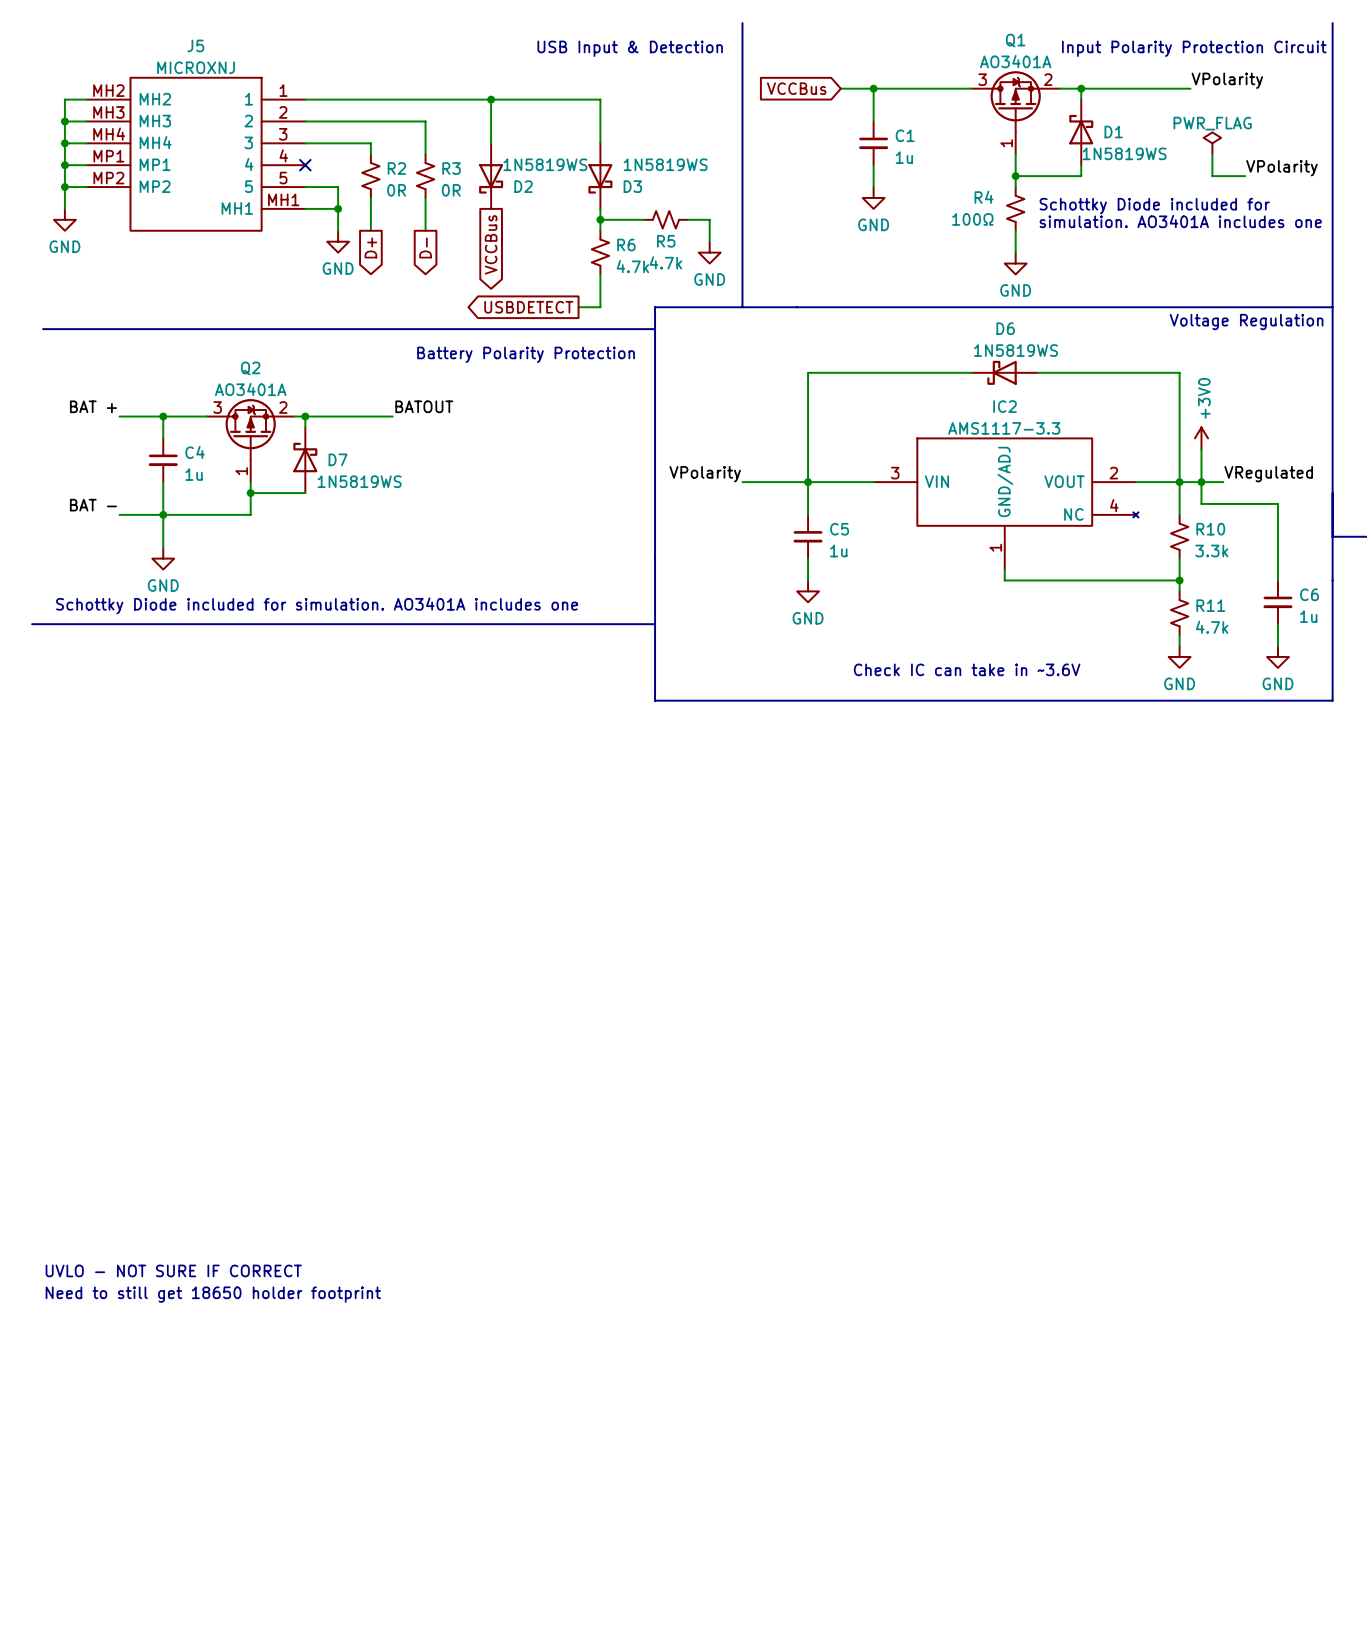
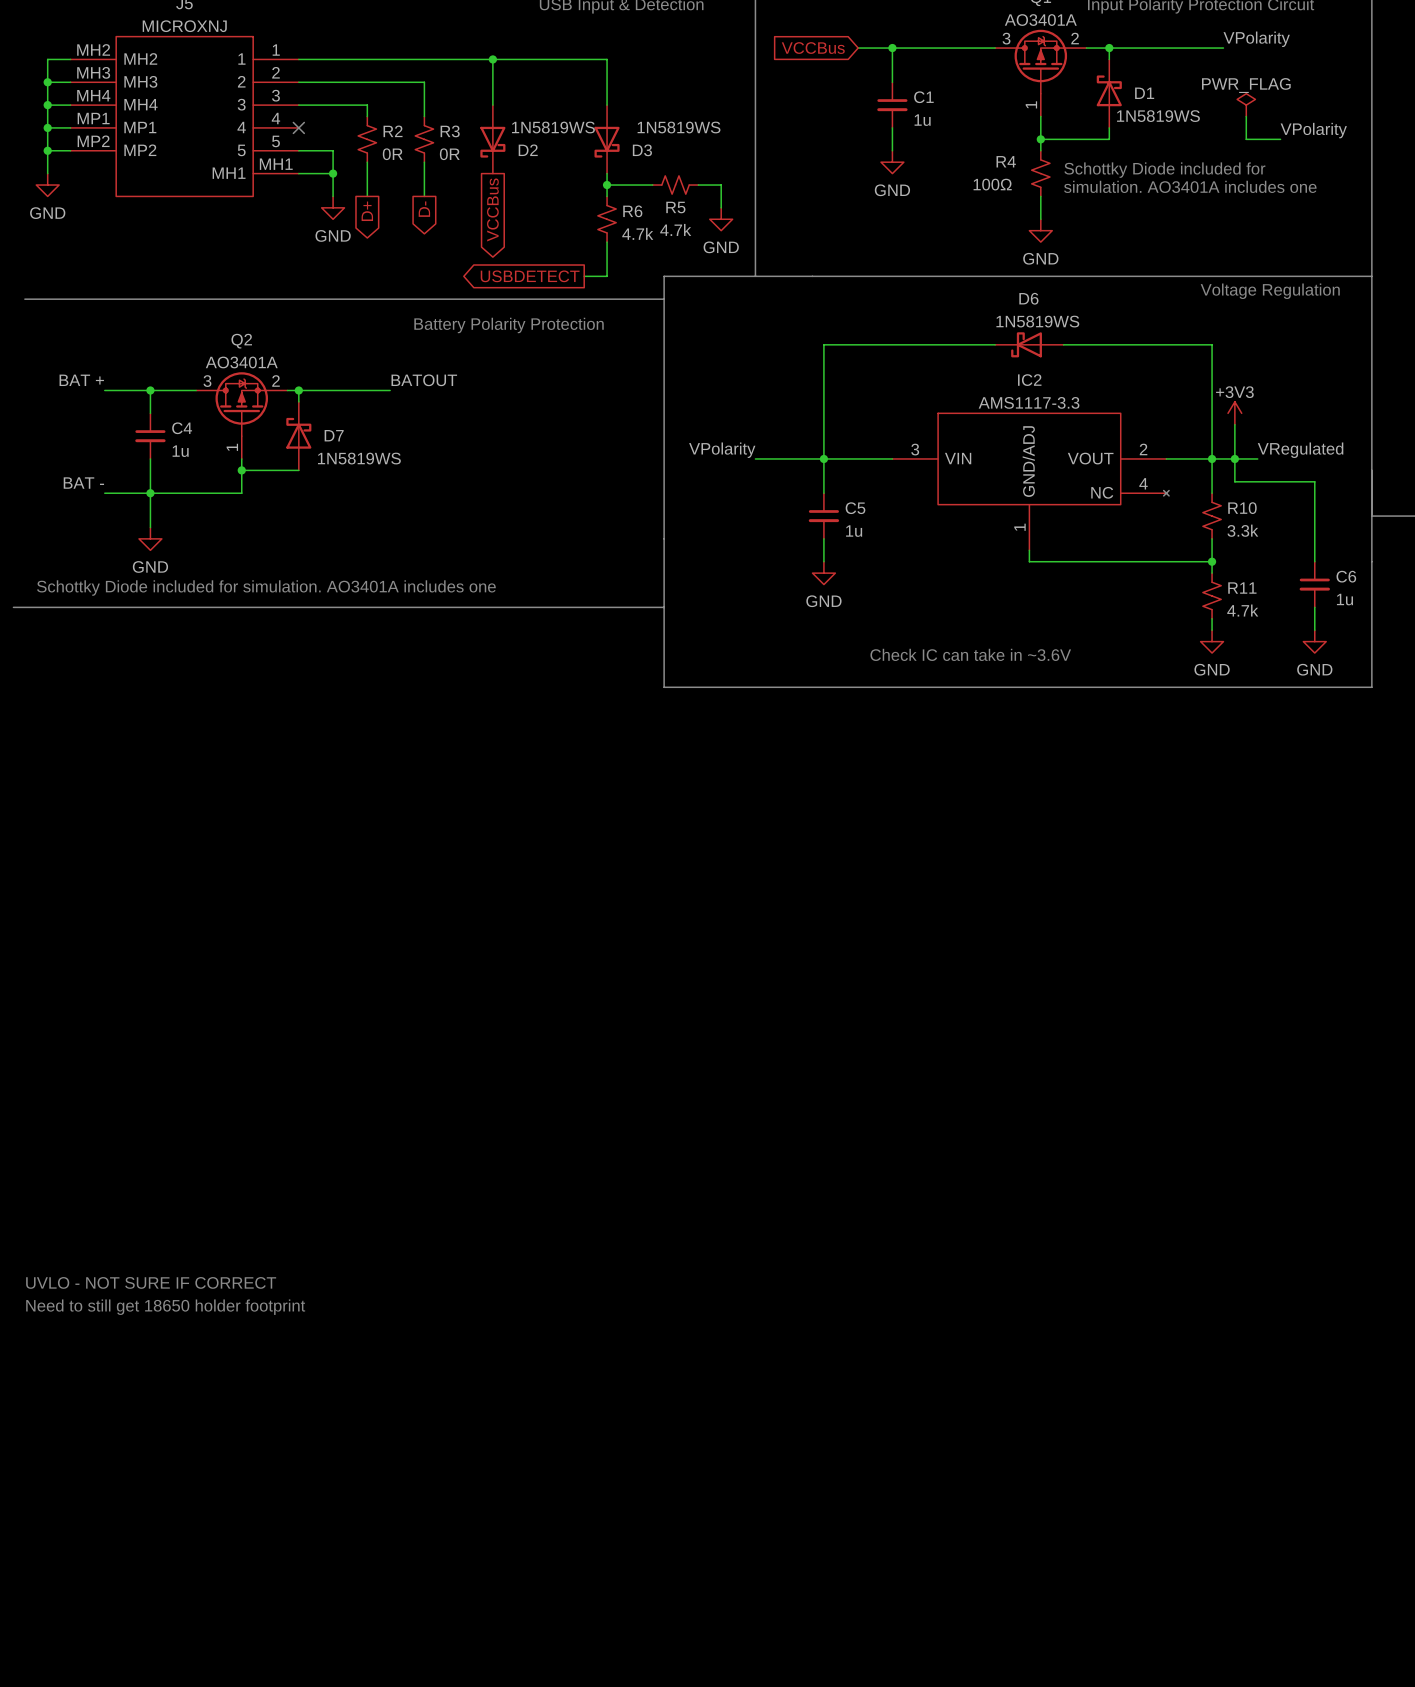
power symbol: +3V0 (1201, 438) -> +3V3 (1234, 413)

